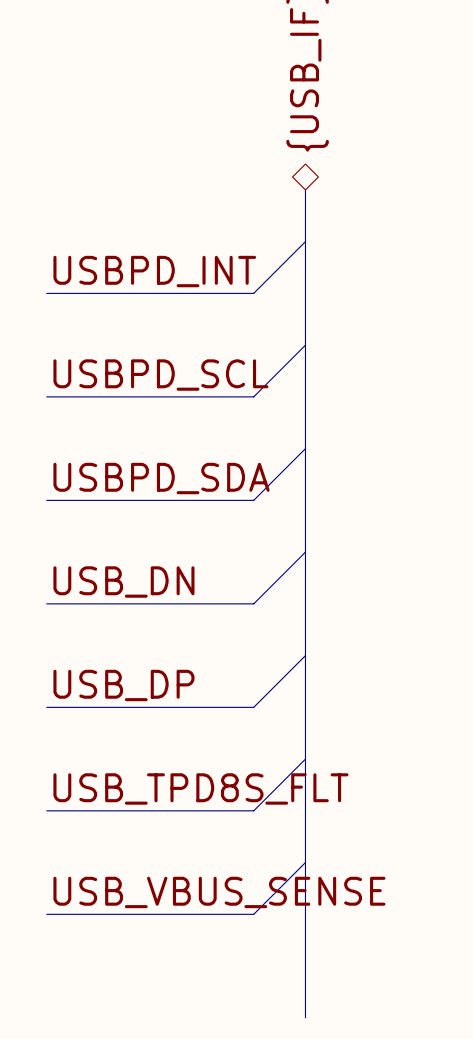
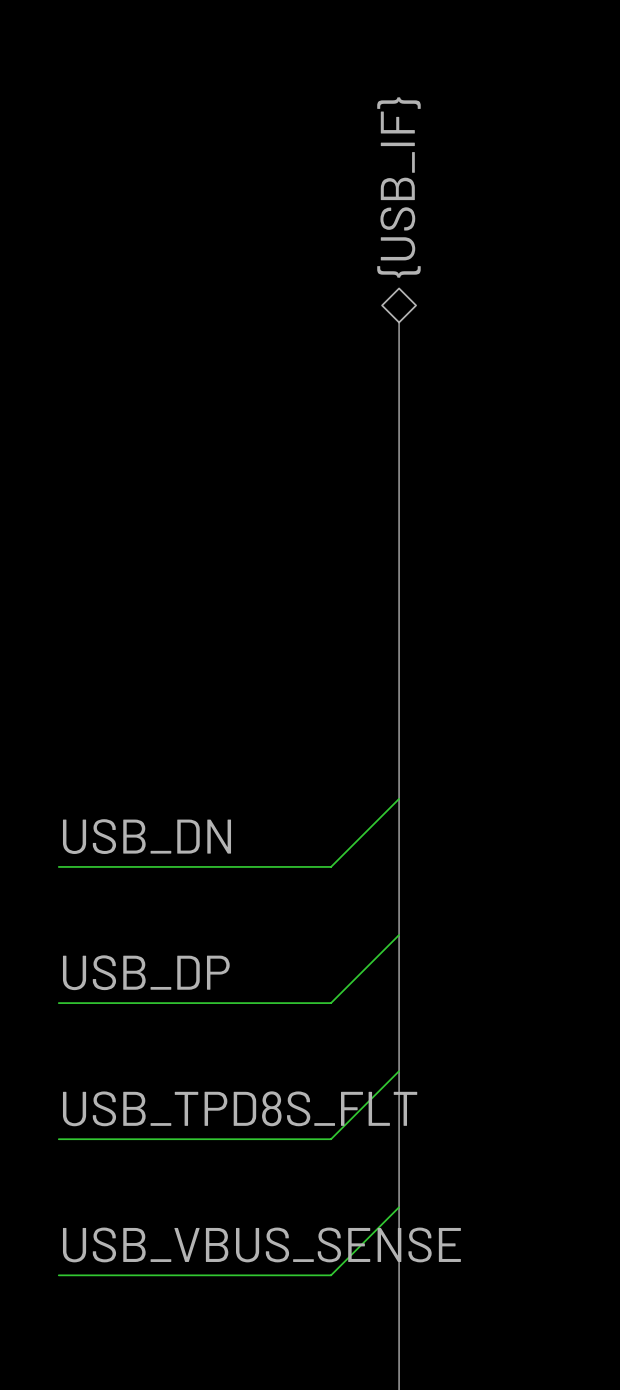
wire: (305, 241) (253, 293) (46, 293) -> none
label: USBPD_INT (154, 271) -> none
wire: (305, 345) (253, 396) (46, 396) -> none
label: USBPD_SCL (160, 375) -> none
wire: (305, 448) (253, 500) (46, 500) -> none
label: USBPD_SDA (161, 478) -> none

